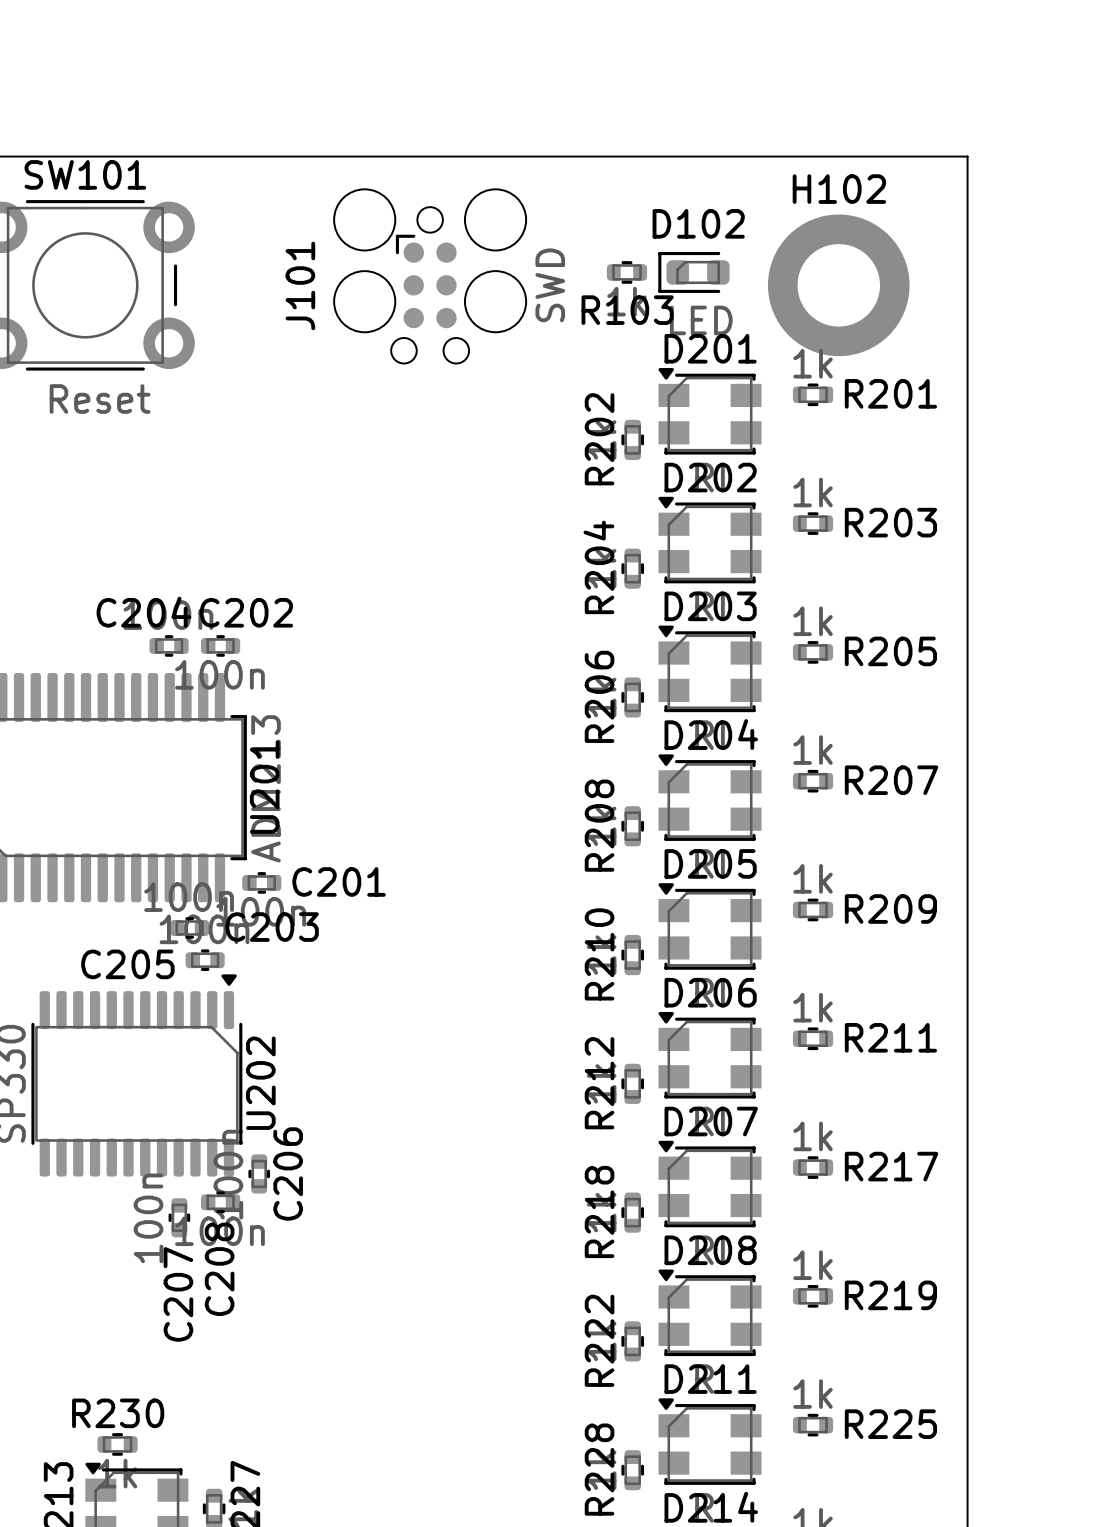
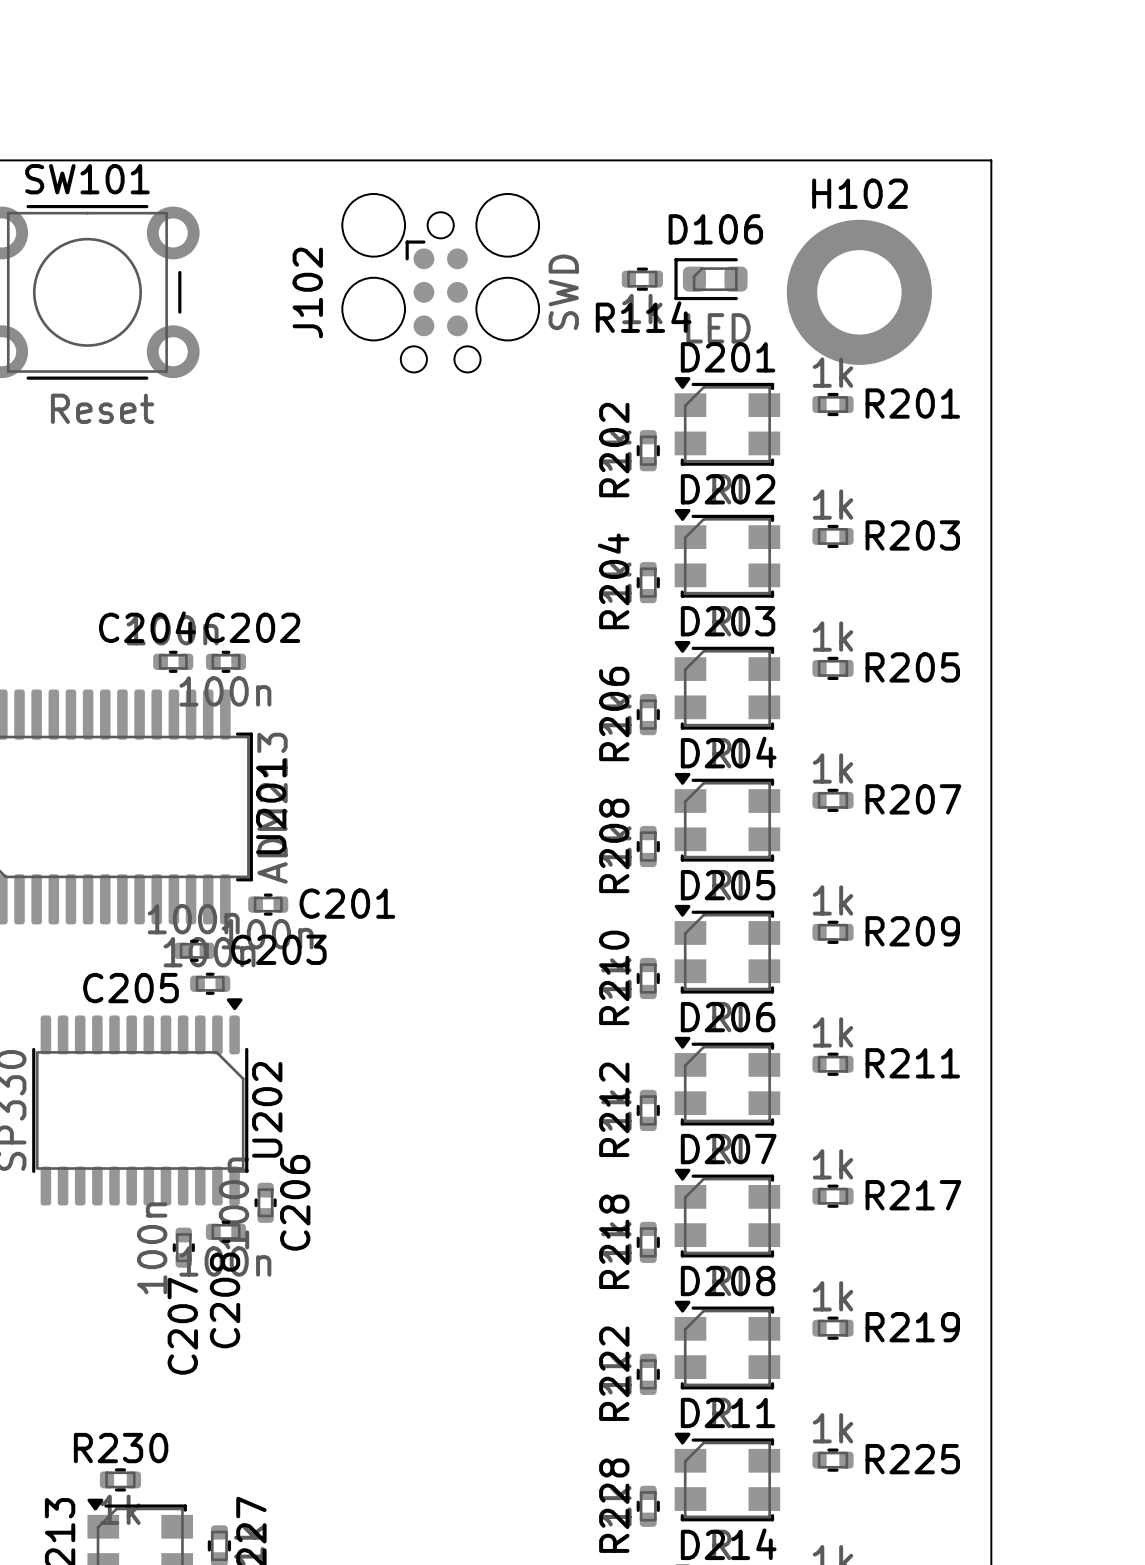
D102 name: D102 (698, 223) -> D106 (715, 229)
J101 name: J101 (300, 285) -> J102 (307, 292)
R103 name: R103 (627, 310) -> R114 (643, 317)

